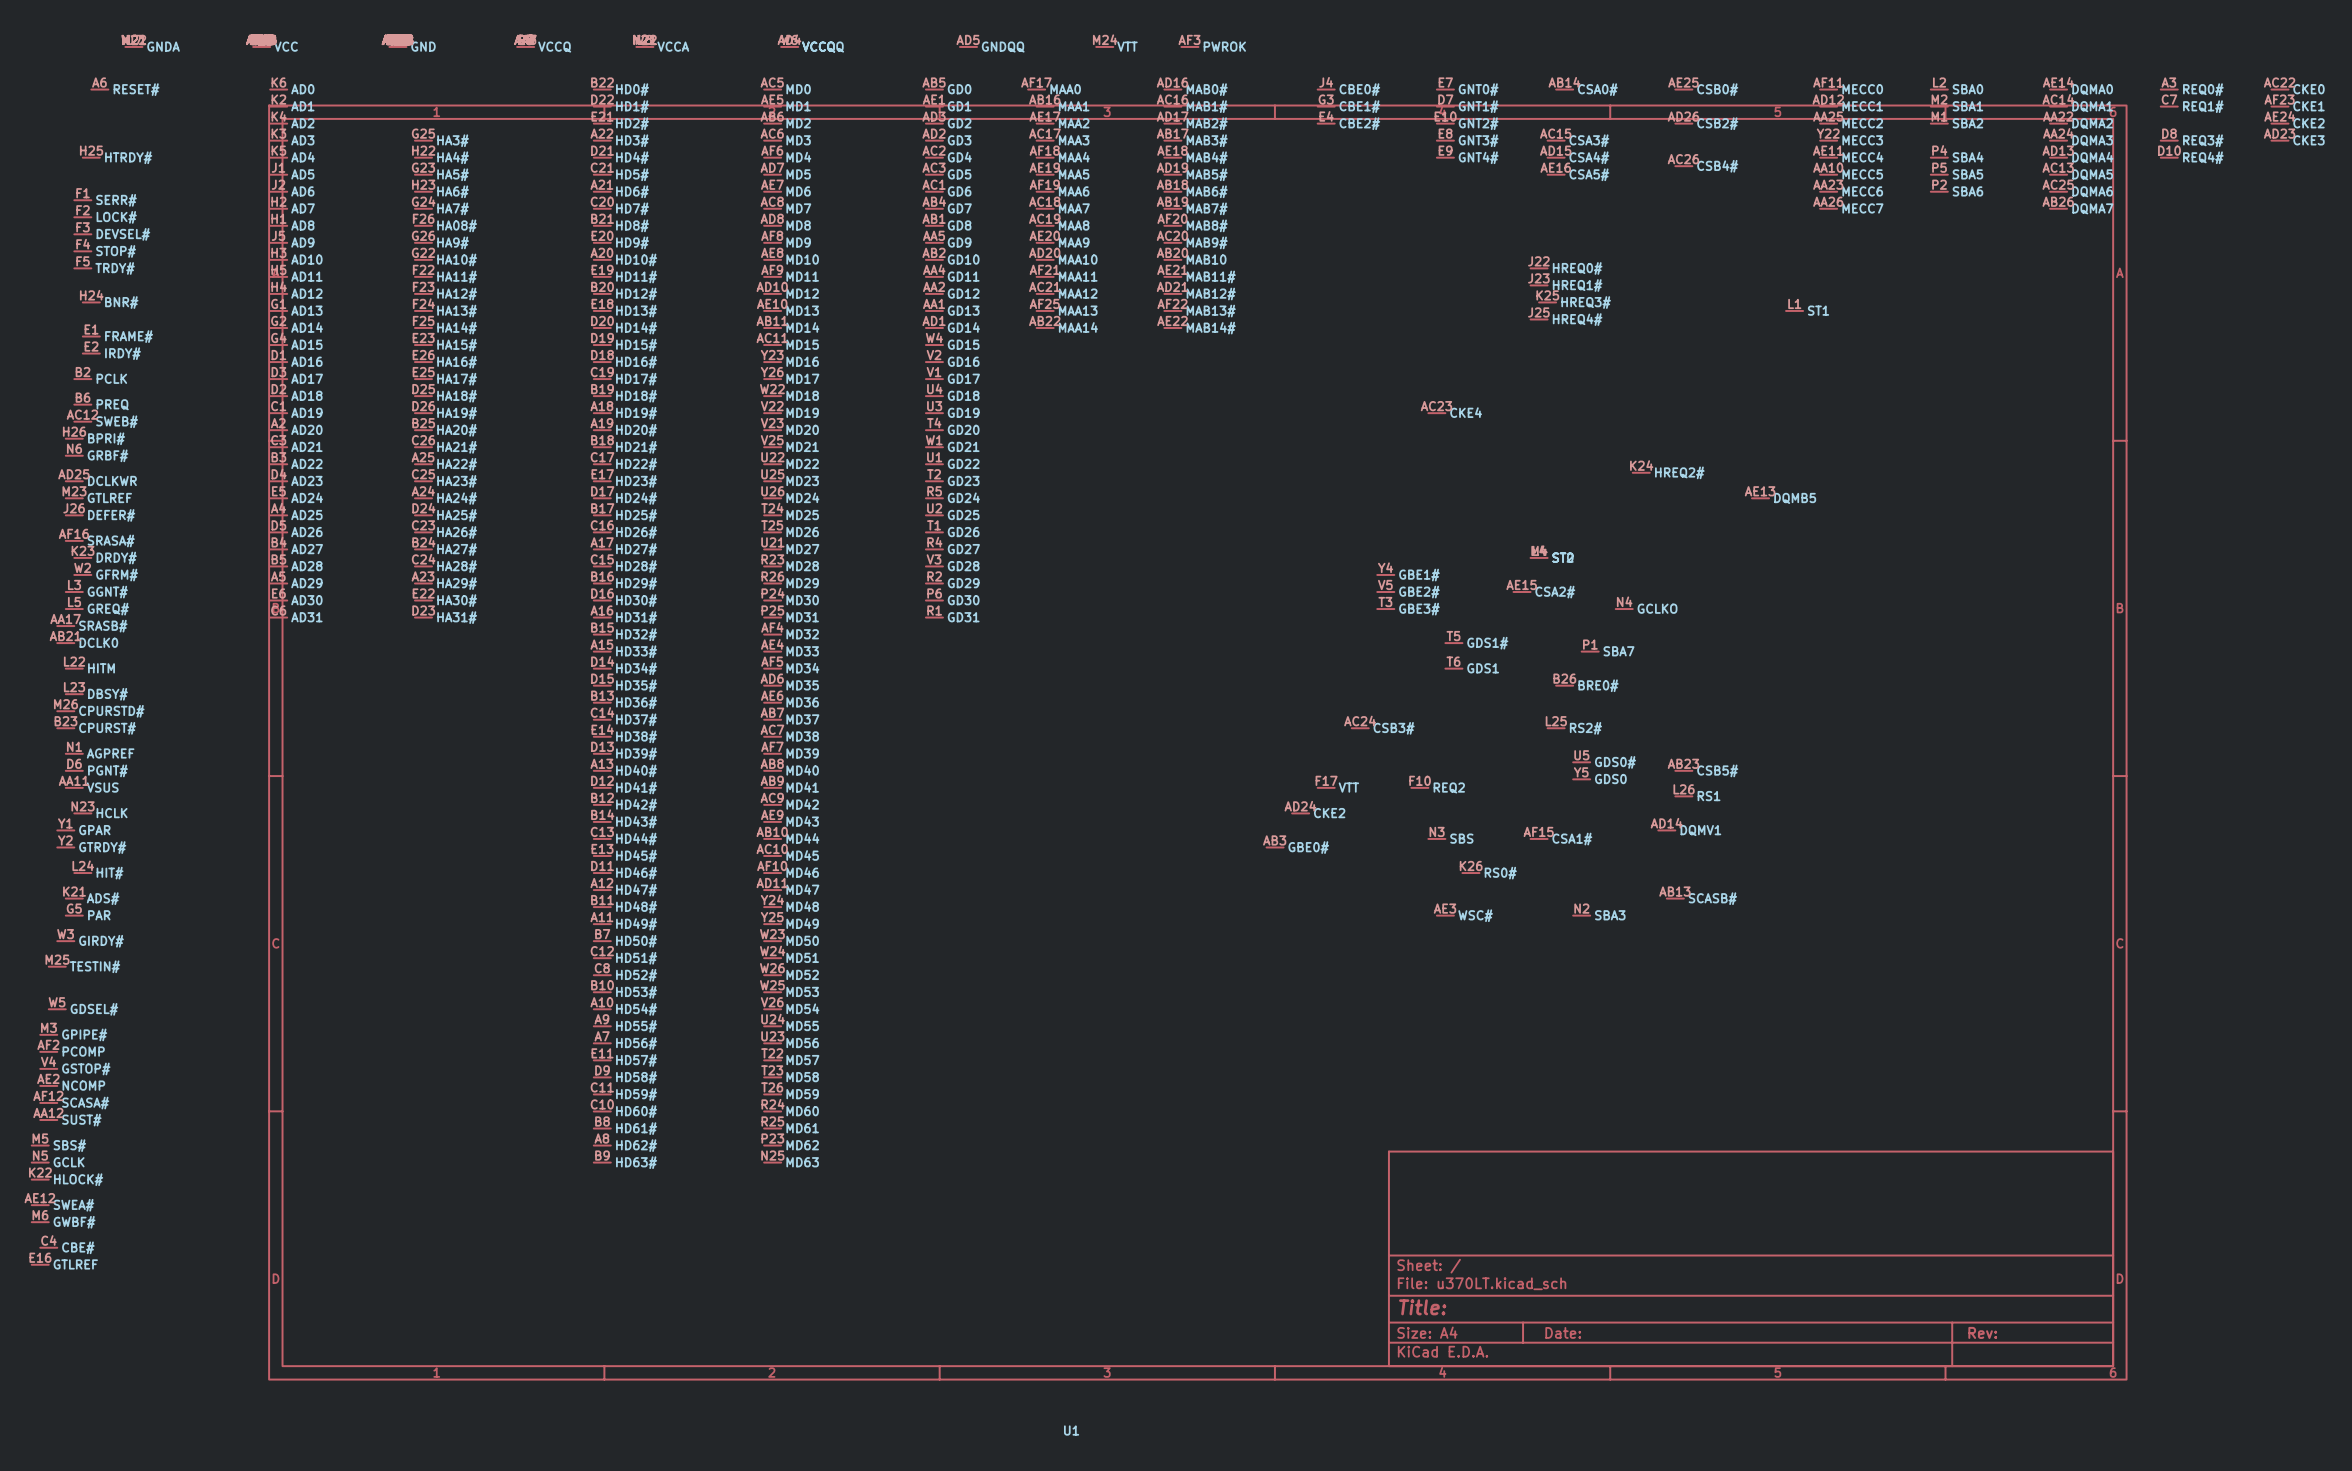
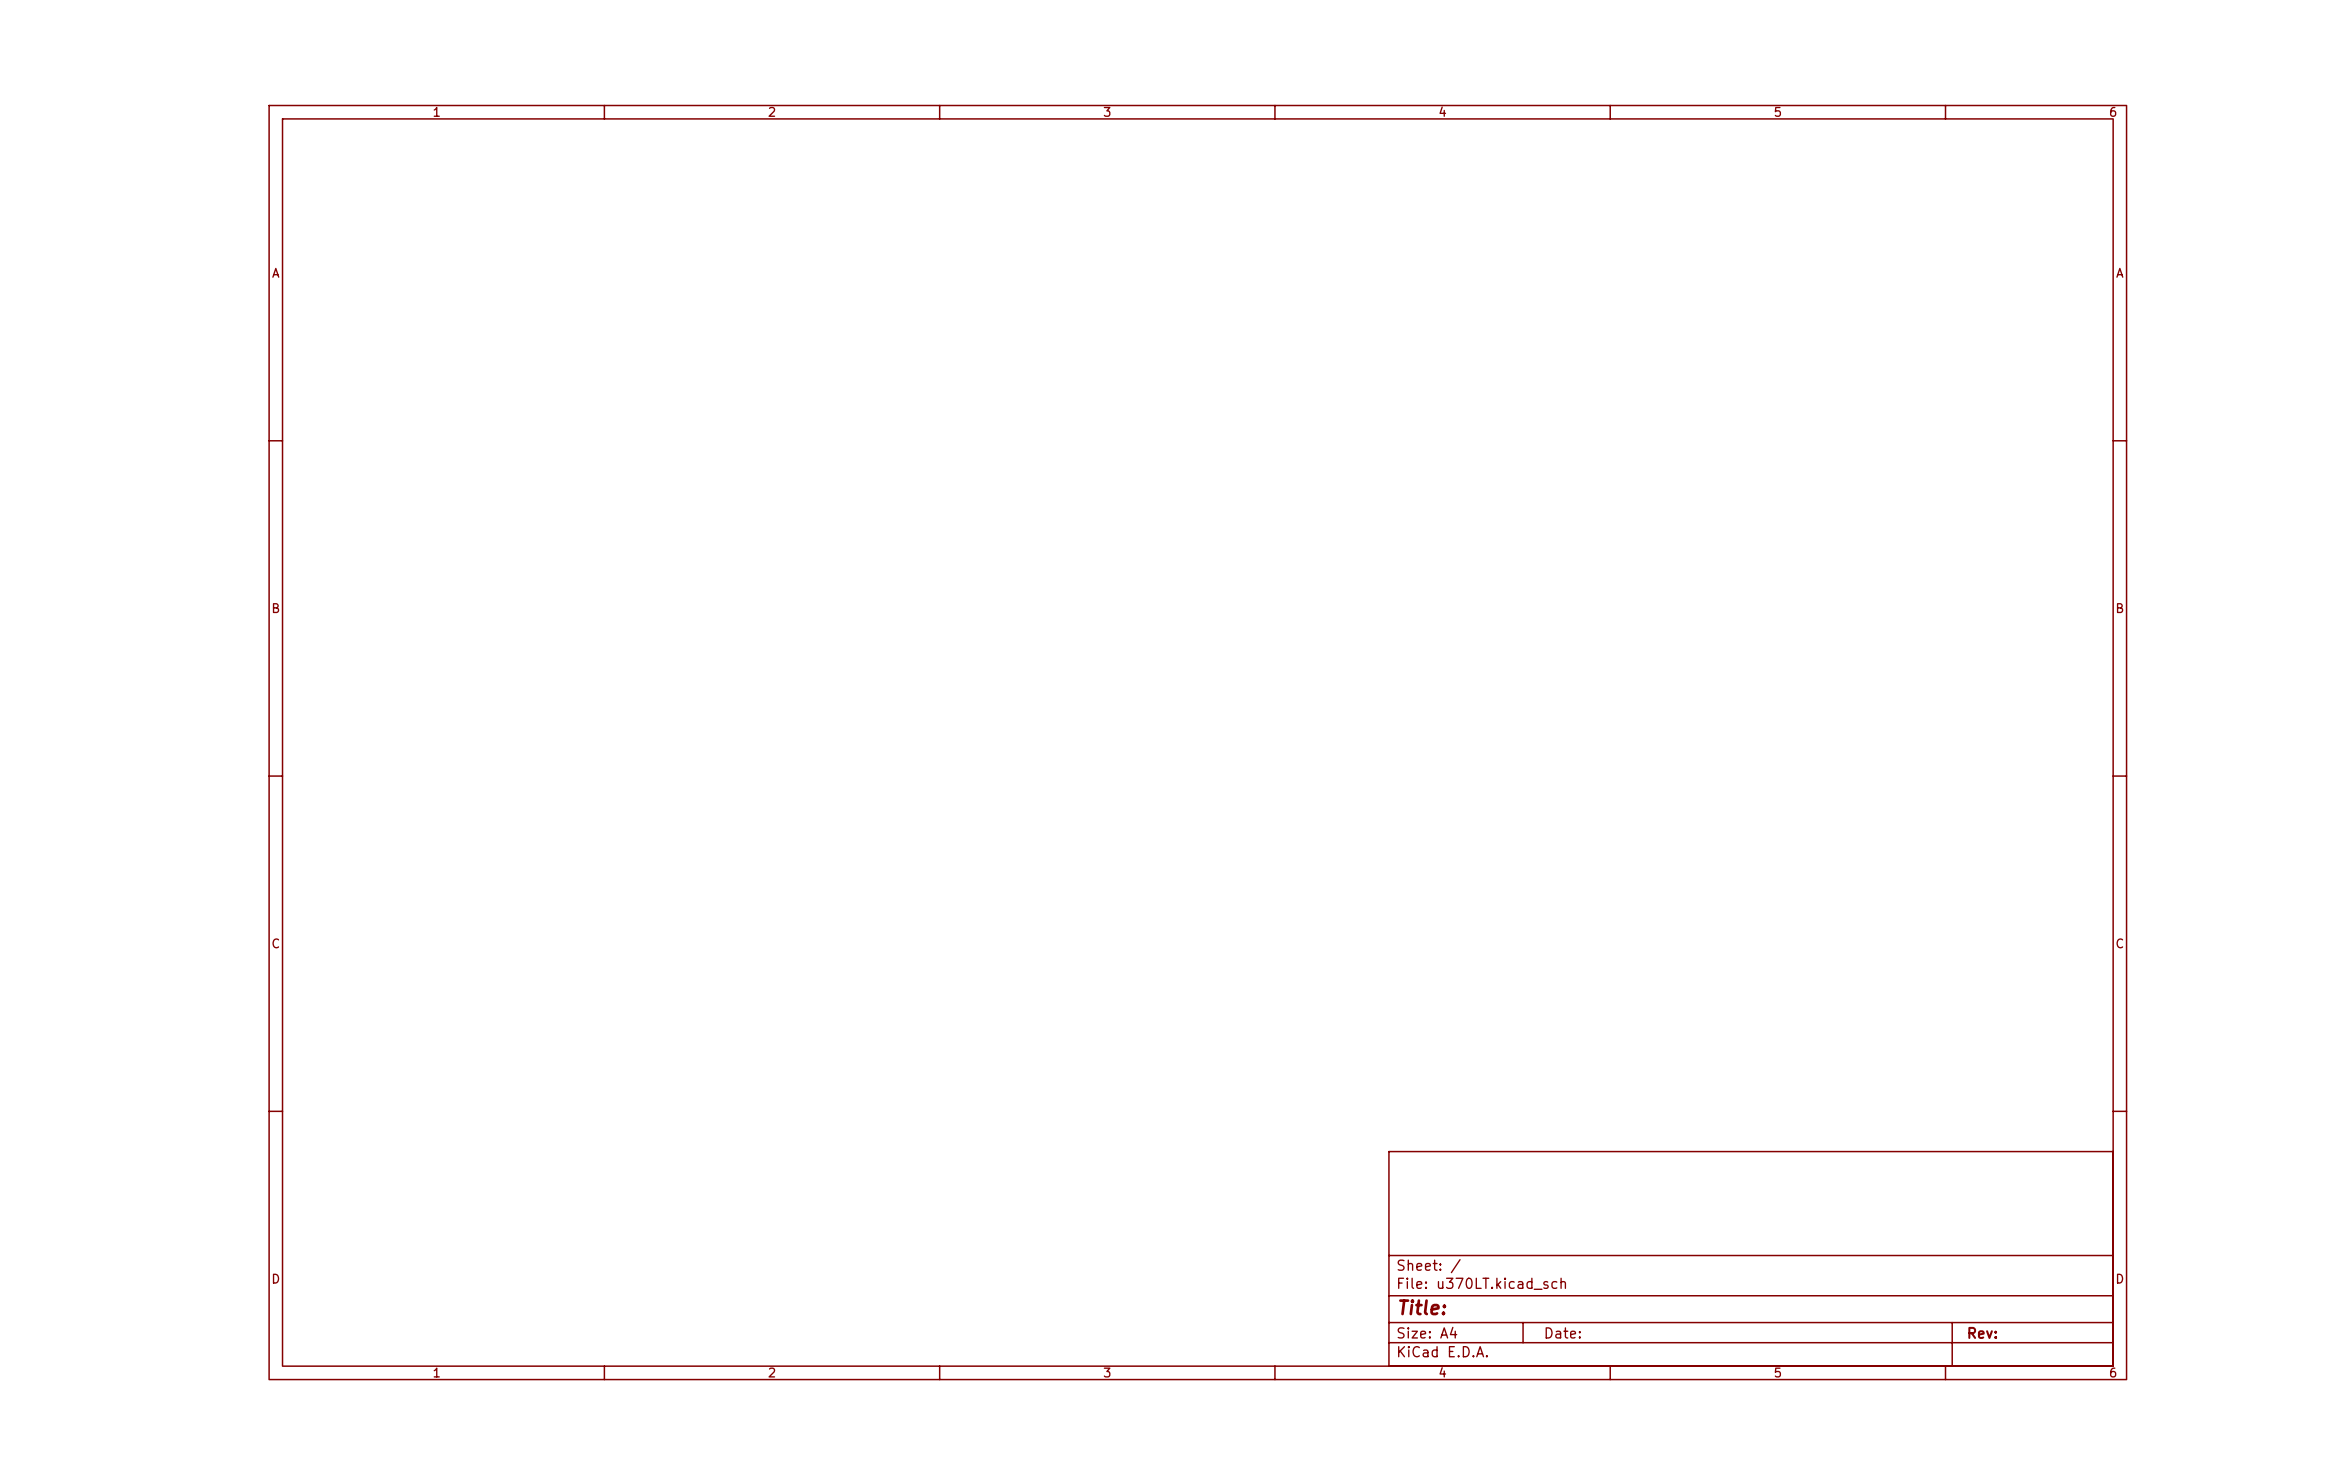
U1: (1160, 655) -> none

